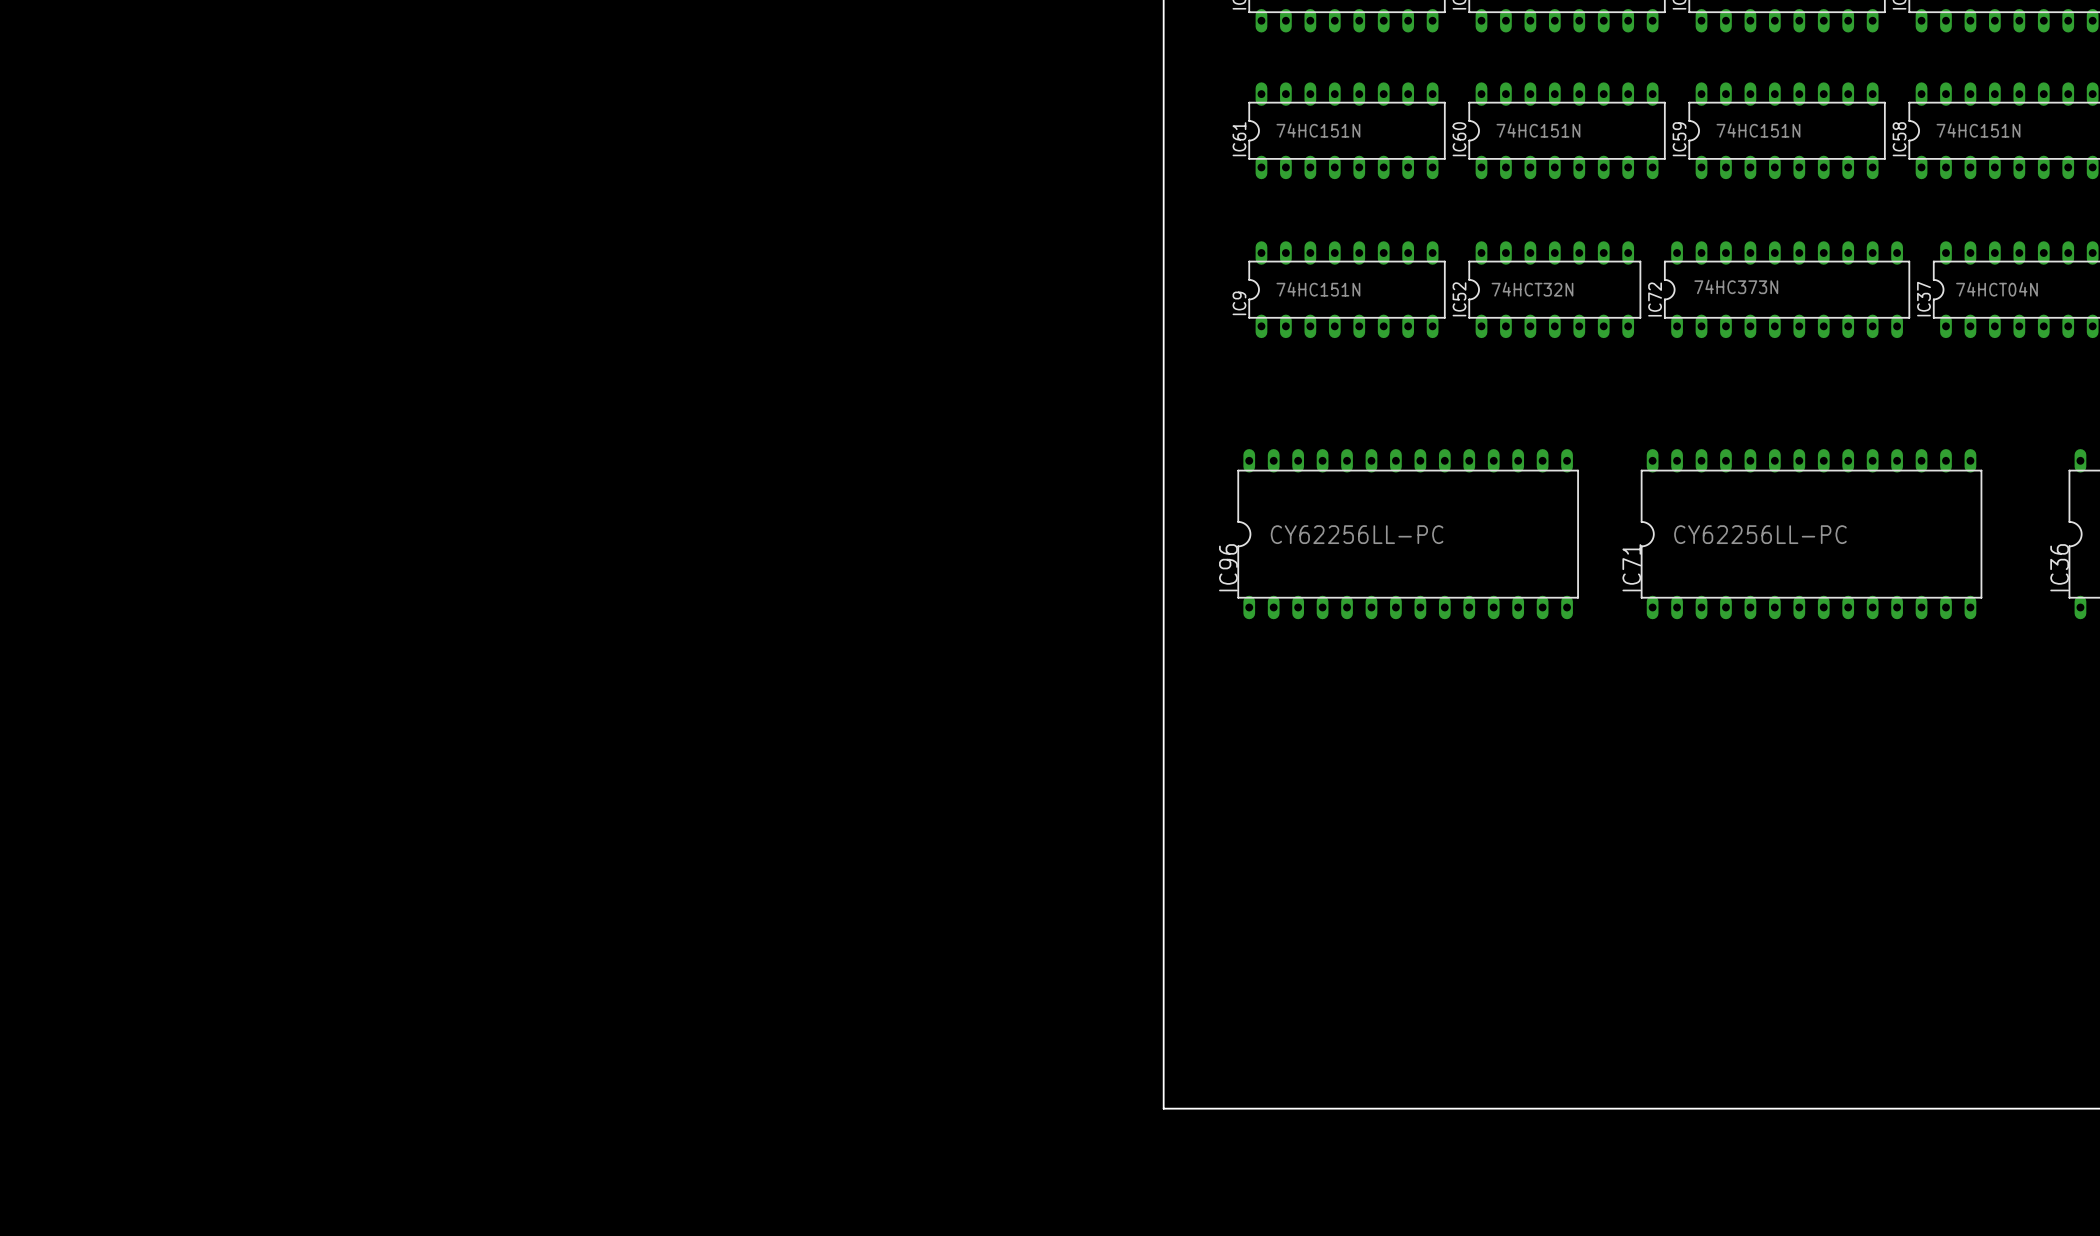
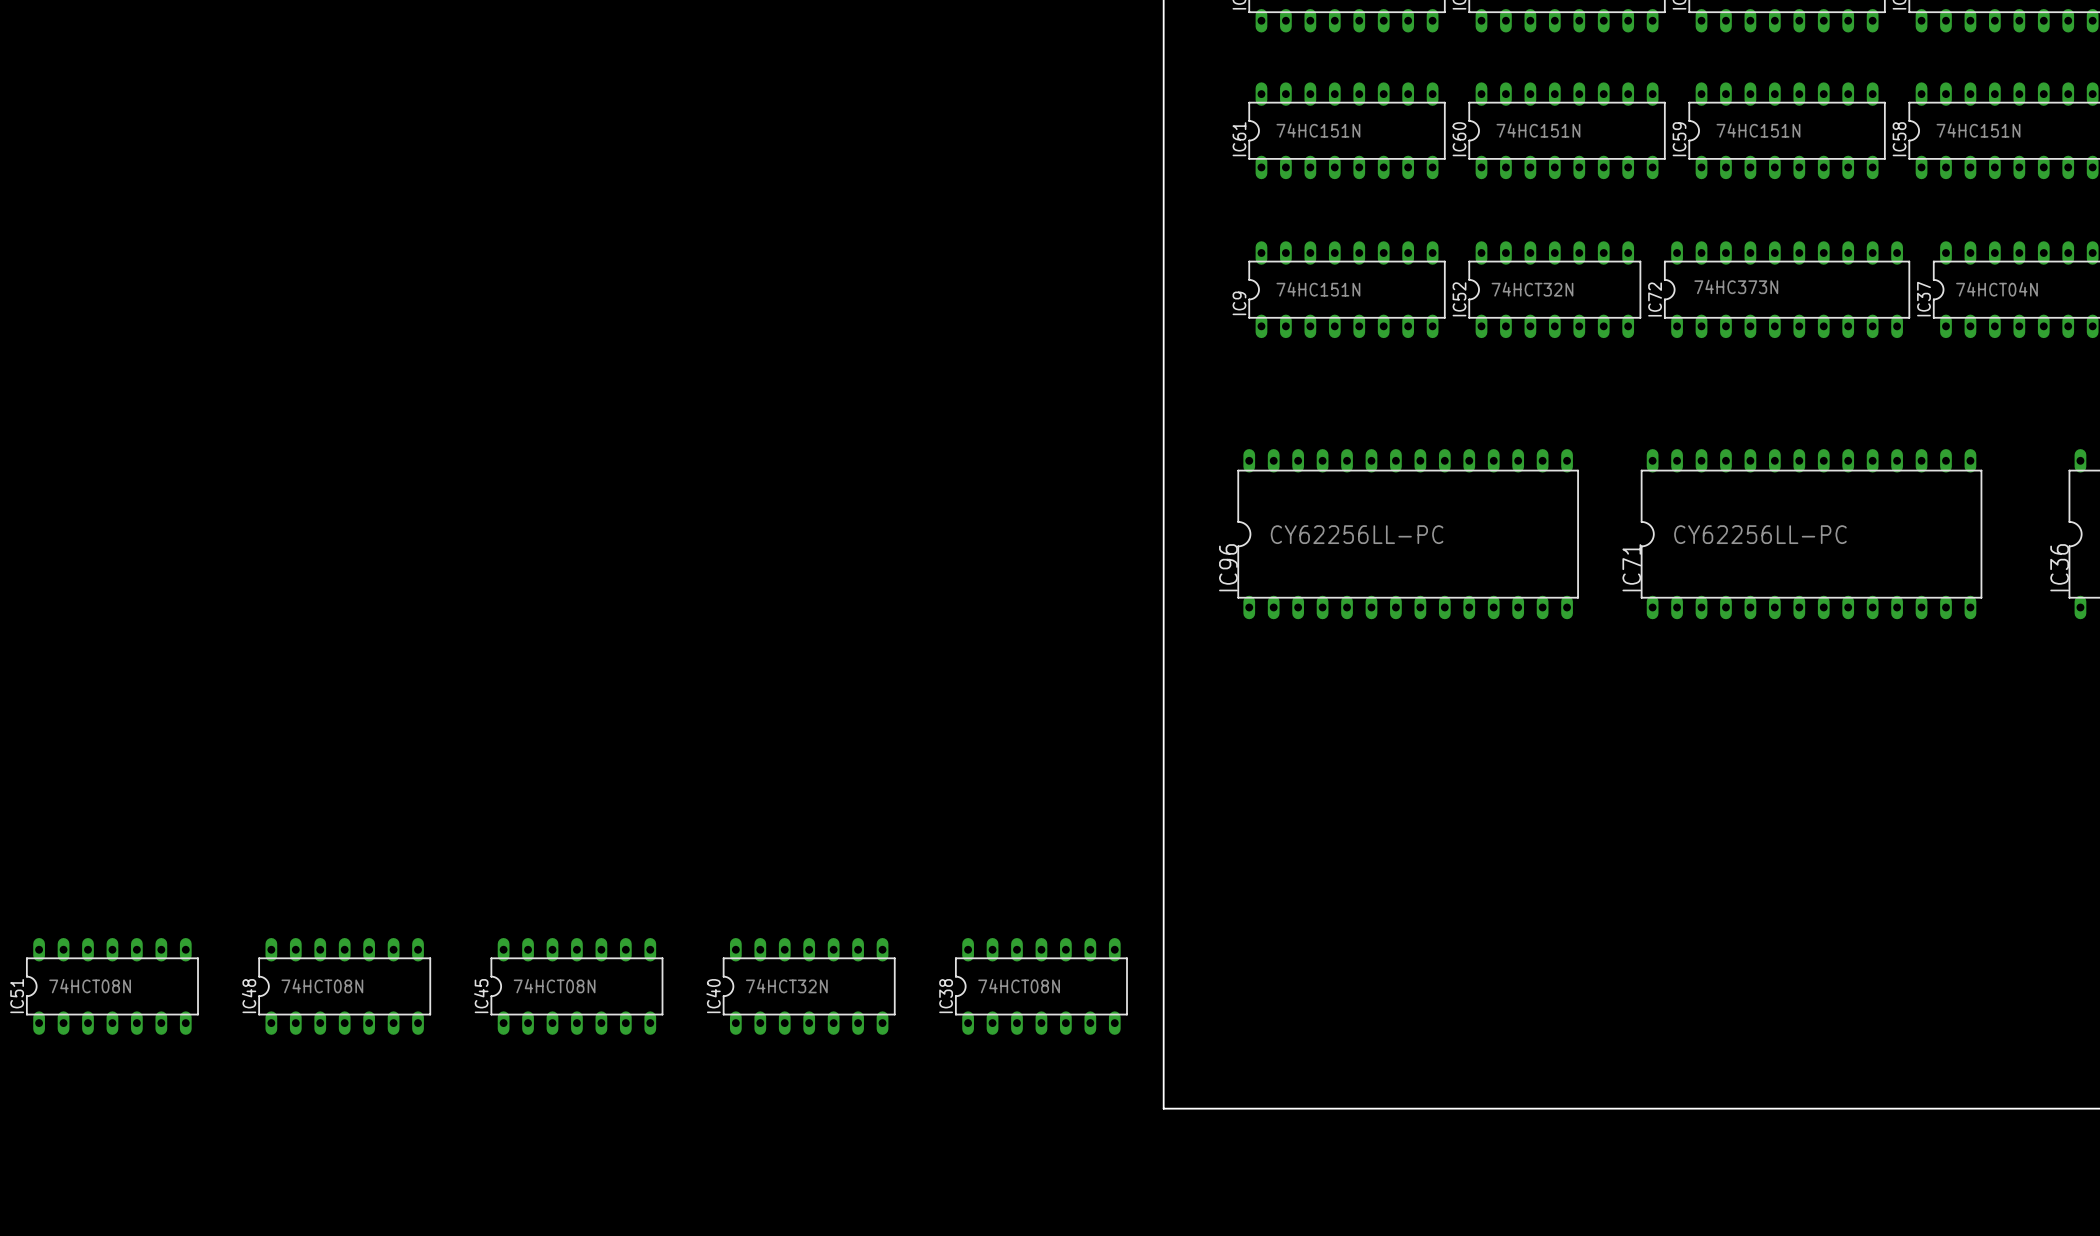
IC51: none -> 74HCT08N (112, 986)
IC48: none -> 74HCT08N (344, 986)
IC45: none -> 74HCT08N (576, 986)
IC40: none -> 74HCT32N (809, 986)
IC38: none -> 74HCT08N (1041, 986)

